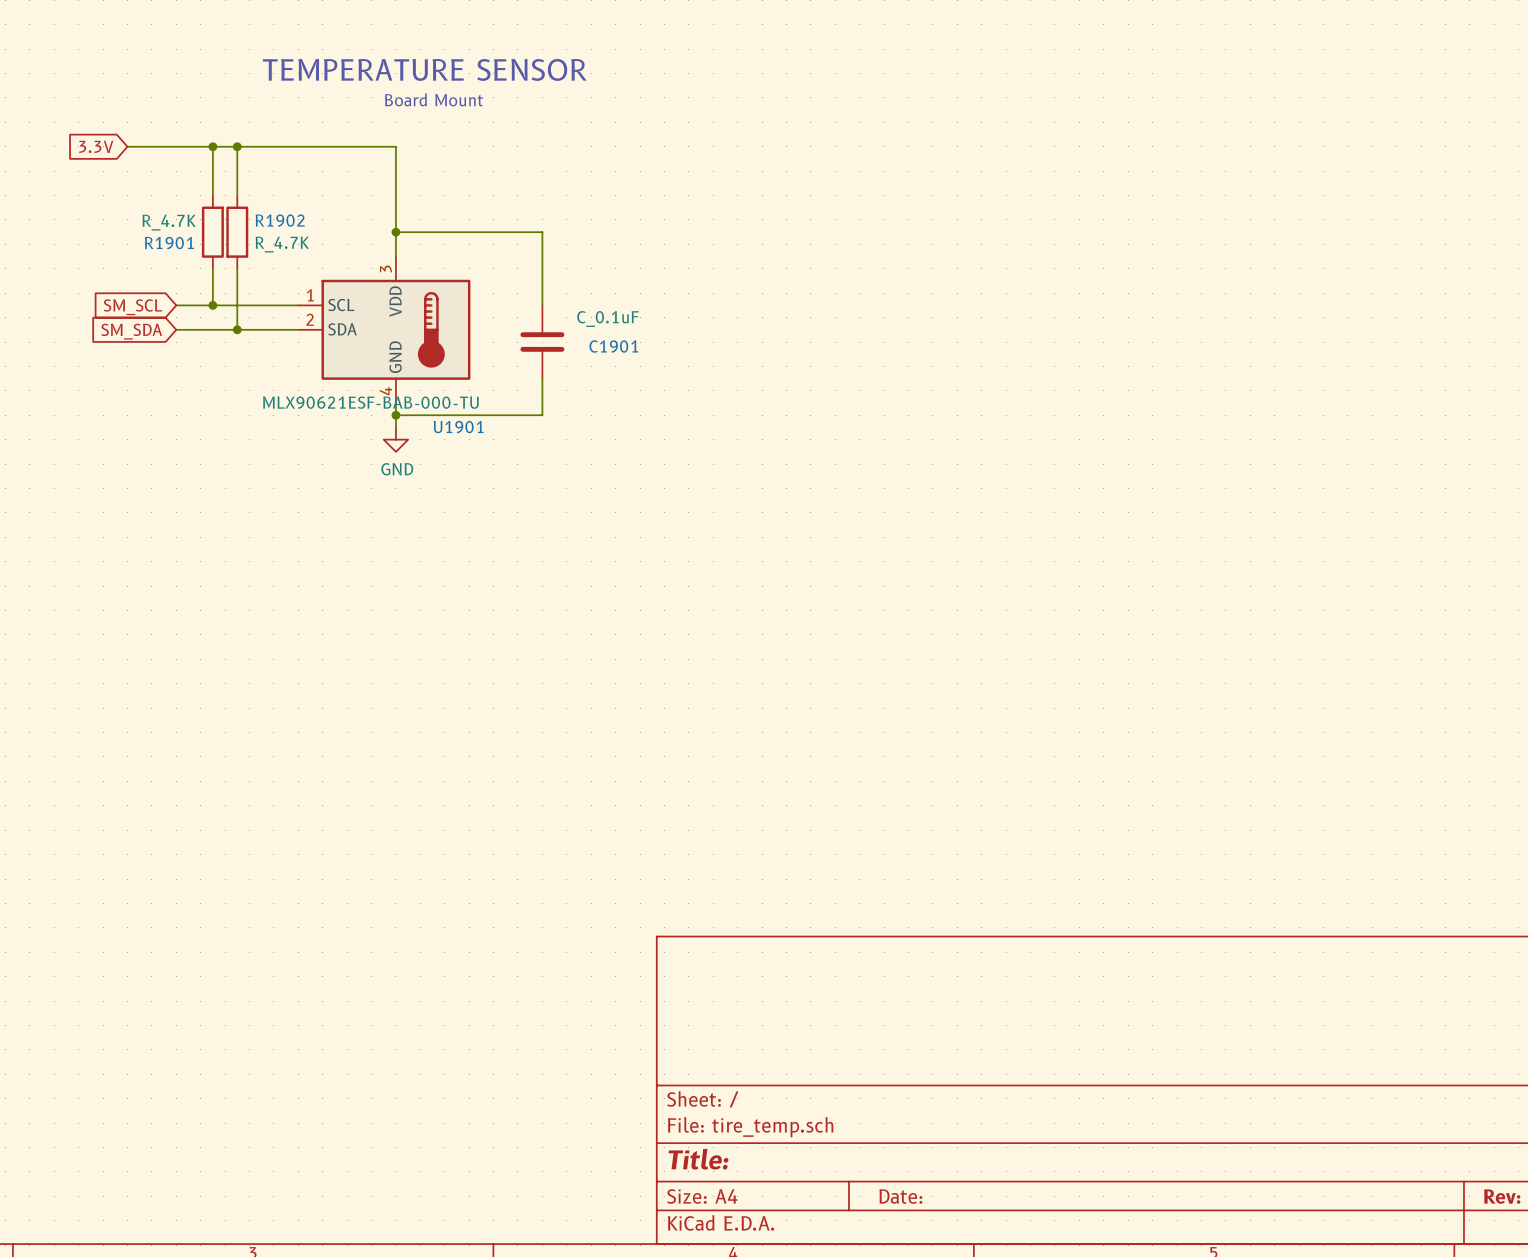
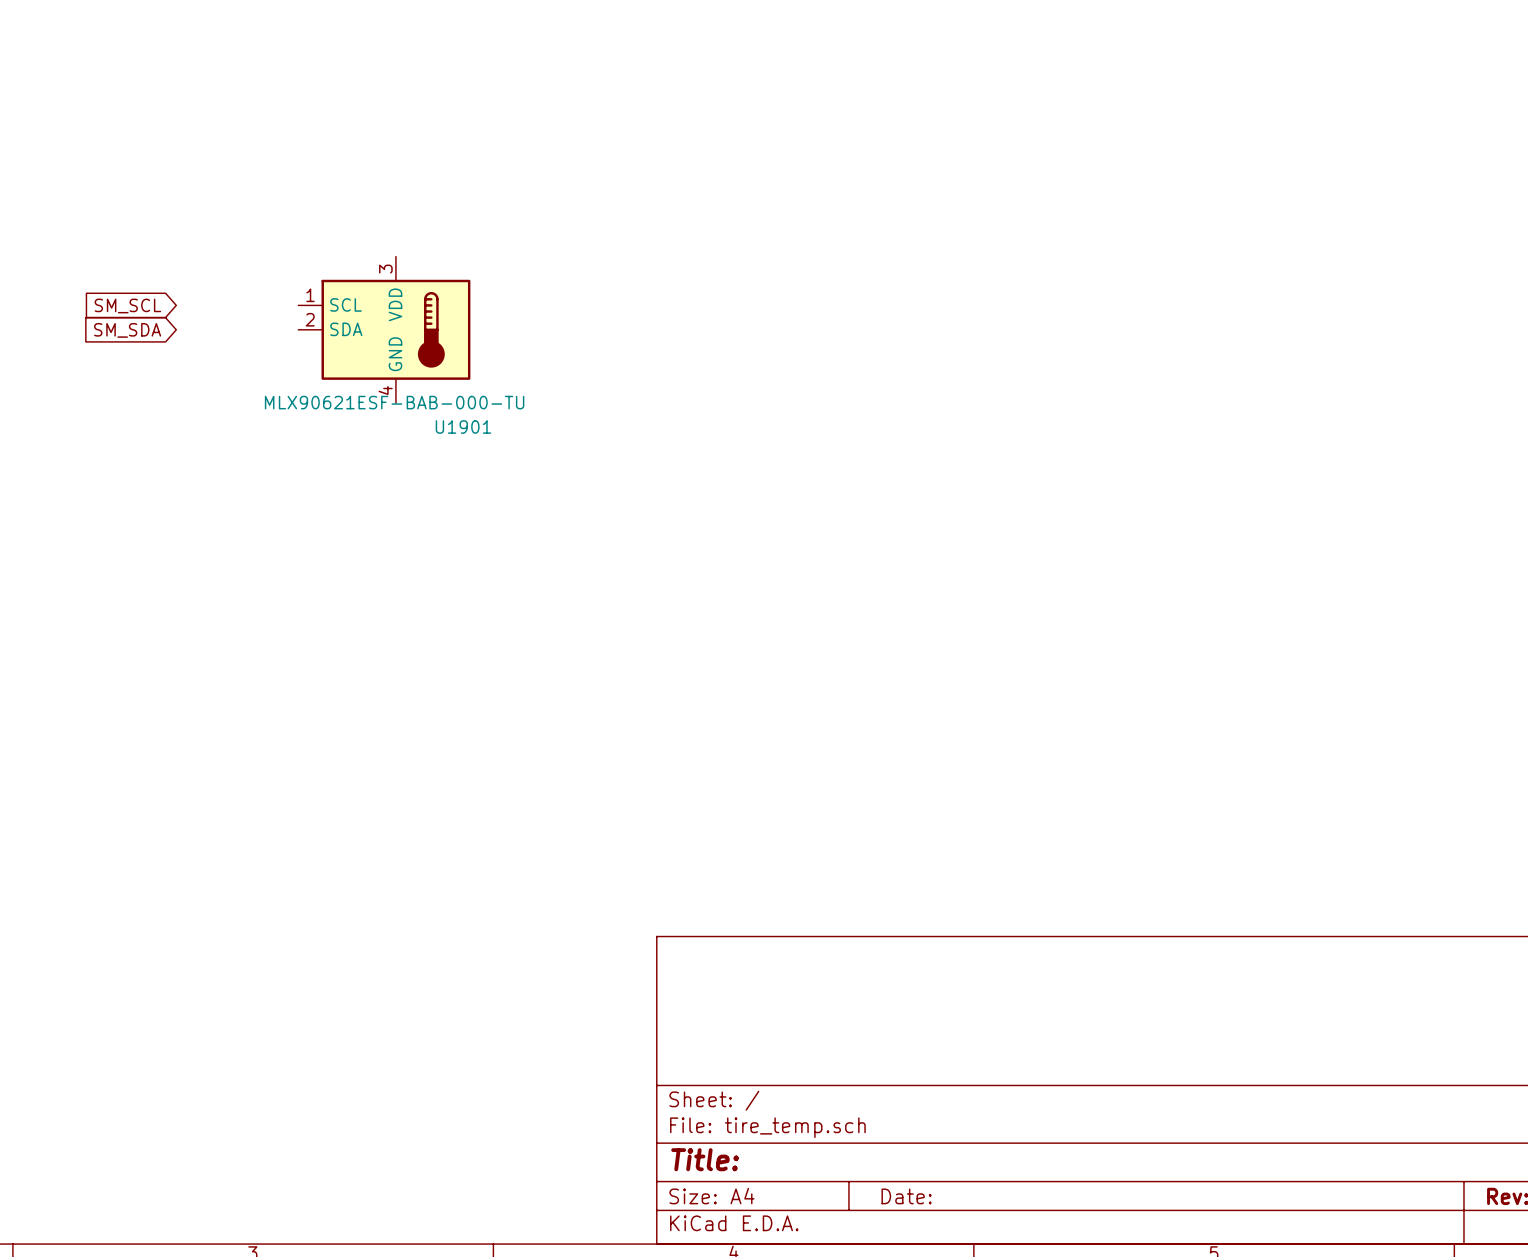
text: TEMPERATURE SENSOR (424, 69) -> none
text: Board Mount (434, 99) -> none
global label: 3.3V (96, 146) -> none
wire: (127, 146) (395, 146) (395, 256) -> none
wire: (212, 146) (212, 195) -> none
junction: (212, 146) -> none
wire: (237, 146) (237, 195) -> none
junction: (237, 146) -> none
R1901: R_4.7K (212, 232) -> none
R1902: R_4.7K (237, 232) -> none
wire: (395, 232) (542, 232) (542, 305) -> none
junction: (395, 232) -> none
wire: (212, 268) (212, 305) -> none
wire: (237, 268) (237, 329) -> none
wire: (176, 305) (298, 305) -> none
junction: (212, 305) -> none
wire: (176, 329) (298, 329) -> none
junction: (237, 329) -> none
C1901: C_0.1uF (542, 342) -> none
wire: (542, 378) (542, 415) (395, 415) -> none
wire: (395, 403) (395, 427) -> none
junction: (395, 415) -> none
power symbol: GND (395, 439) -> none

